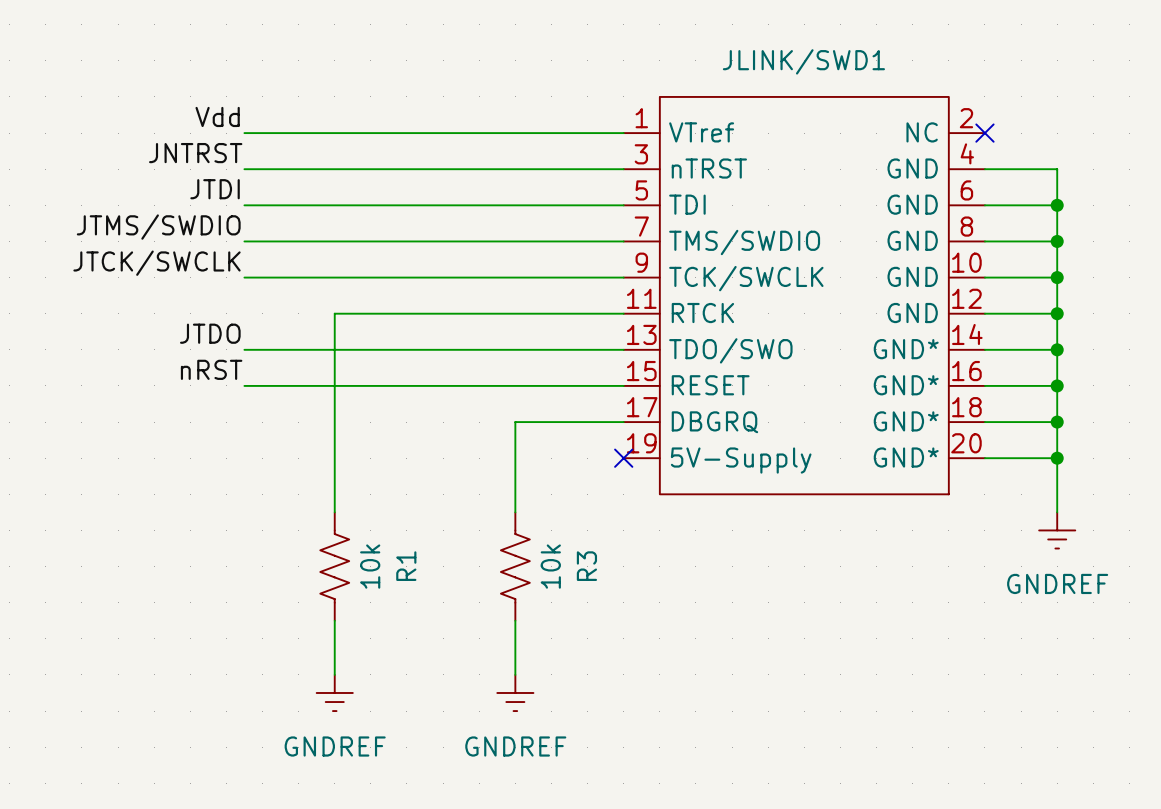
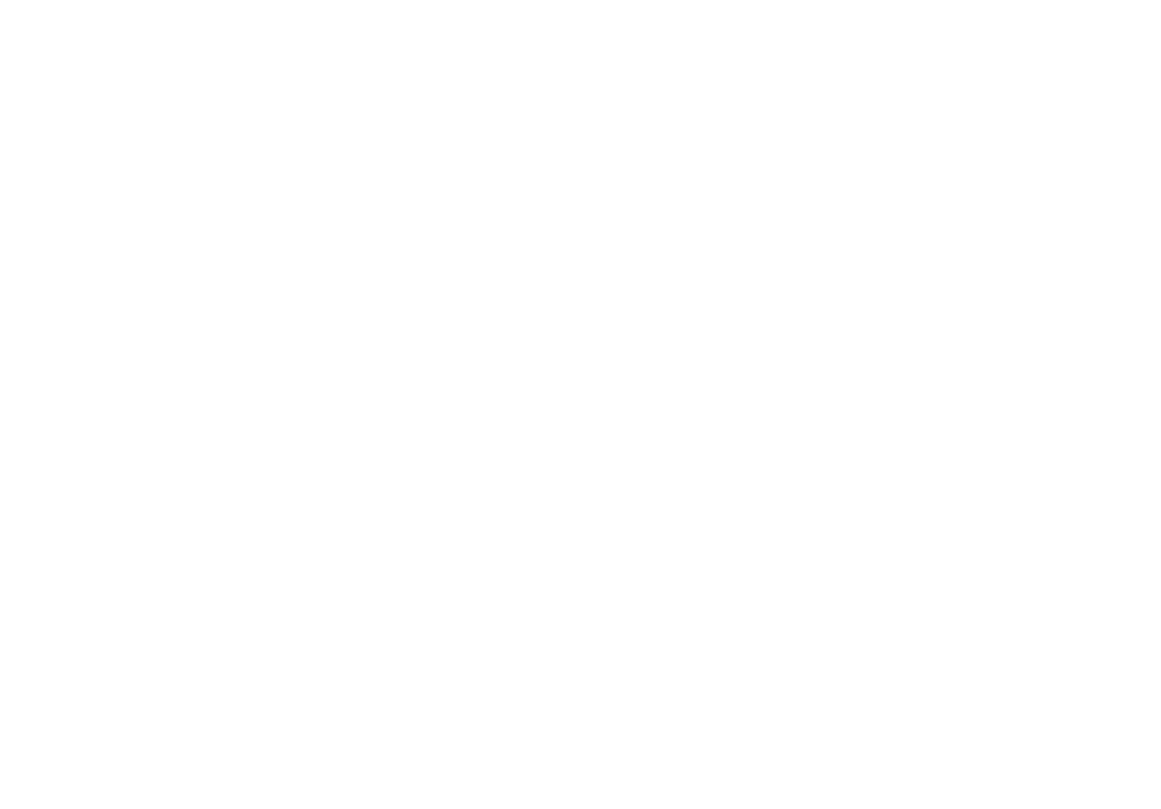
label: Vdd (217, 116) -> none
wire: (244, 133) (623, 133) -> none
no-connect mark: (984, 133) -> none
label: JNTRST (195, 153) -> none
wire: (244, 169) (623, 169) -> none
wire: (984, 169) (1057, 169) (1057, 512) -> none
label: JTDI (215, 189) -> none
wire: (244, 205) (623, 205) -> none
wire: (984, 205) (1057, 205) -> none
junction: (1057, 205) -> none
label: JTMS/SWDIO (158, 227) -> none
wire: (244, 241) (623, 241) -> none
wire: (984, 241) (1057, 241) -> none
junction: (1057, 241) -> none
label: JTCK/SWCLK (157, 263) -> none
wire: (244, 277) (623, 277) -> none
wire: (984, 277) (1057, 277) -> none
junction: (1057, 277) -> none
JLINK/SWD1: (804, 295) -> none
wire: (623, 313) (334, 313) (334, 512) -> none
wire: (984, 313) (1057, 313) -> none
junction: (1057, 313) -> none
label: JTDO (210, 333) -> none
wire: (244, 349) (623, 349) -> none
wire: (984, 349) (1057, 349) -> none
junction: (1057, 349) -> none
label: nRST (211, 369) -> none
wire: (244, 385) (623, 385) -> none
wire: (984, 385) (1057, 385) -> none
junction: (1057, 385) -> none
wire: (623, 422) (515, 422) (515, 512) -> none
wire: (984, 422) (1057, 422) -> none
junction: (1057, 422) -> none
no-connect mark: (623, 458) -> none
wire: (984, 458) (1057, 458) -> none
junction: (1057, 458) -> none
power symbol: GNDREF (1057, 530) -> none
R1: 10k (334, 566) -> none
R3: 10k (515, 566) -> none
wire: (334, 620) (334, 674) -> none
wire: (515, 620) (515, 674) -> none
power symbol: GNDREF (334, 692) -> none
power symbol: GNDREF (515, 692) -> none

